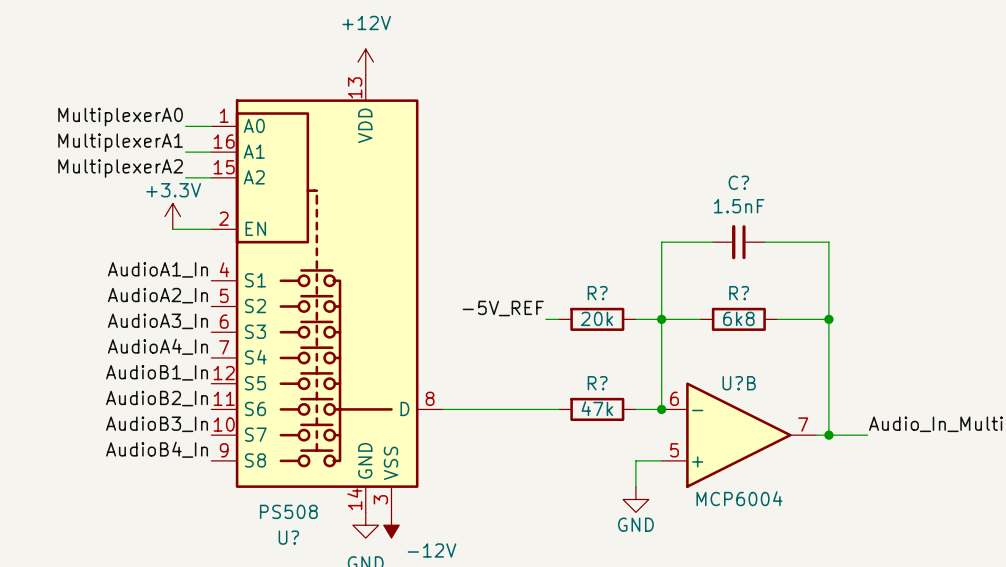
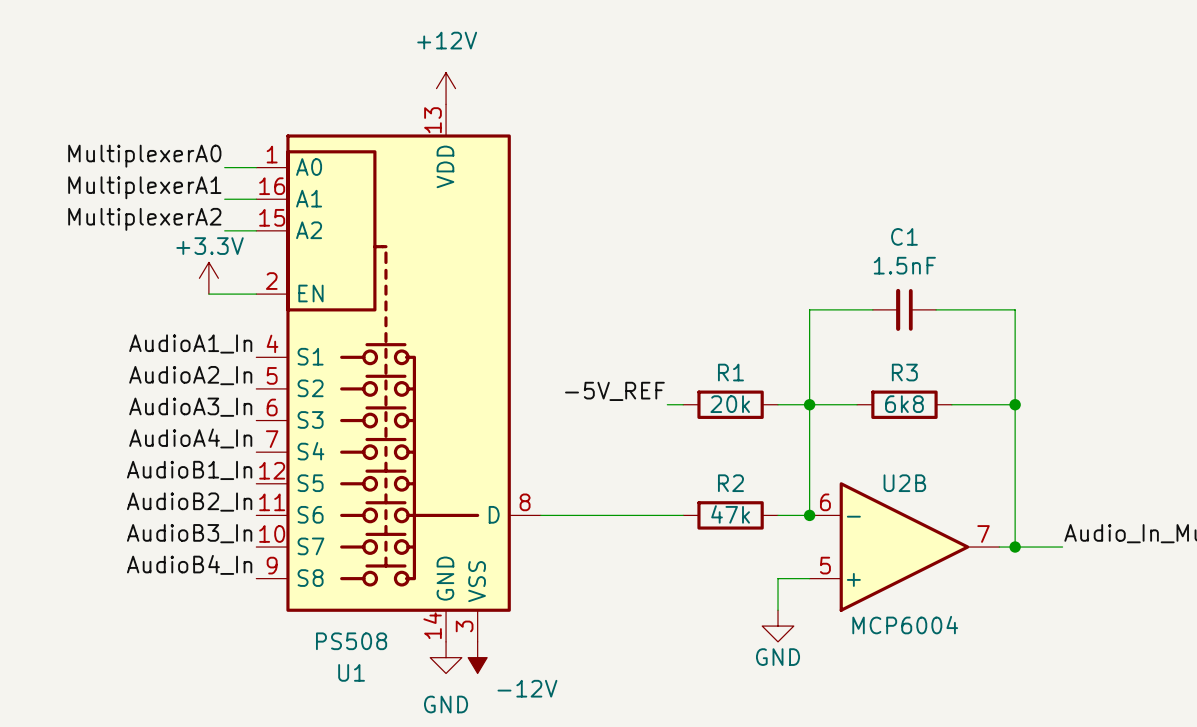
C? name: C? (738, 182) -> C1 (904, 236)
R? name: R? (597, 293) -> R1 (730, 372)
R? name: R? (739, 293) -> R3 (904, 372)
R? name: R? (597, 383) -> R2 (730, 483)
U?B name: U?B (739, 383) -> U2B (904, 483)
U? name: U? (288, 537) -> U1 (351, 672)

